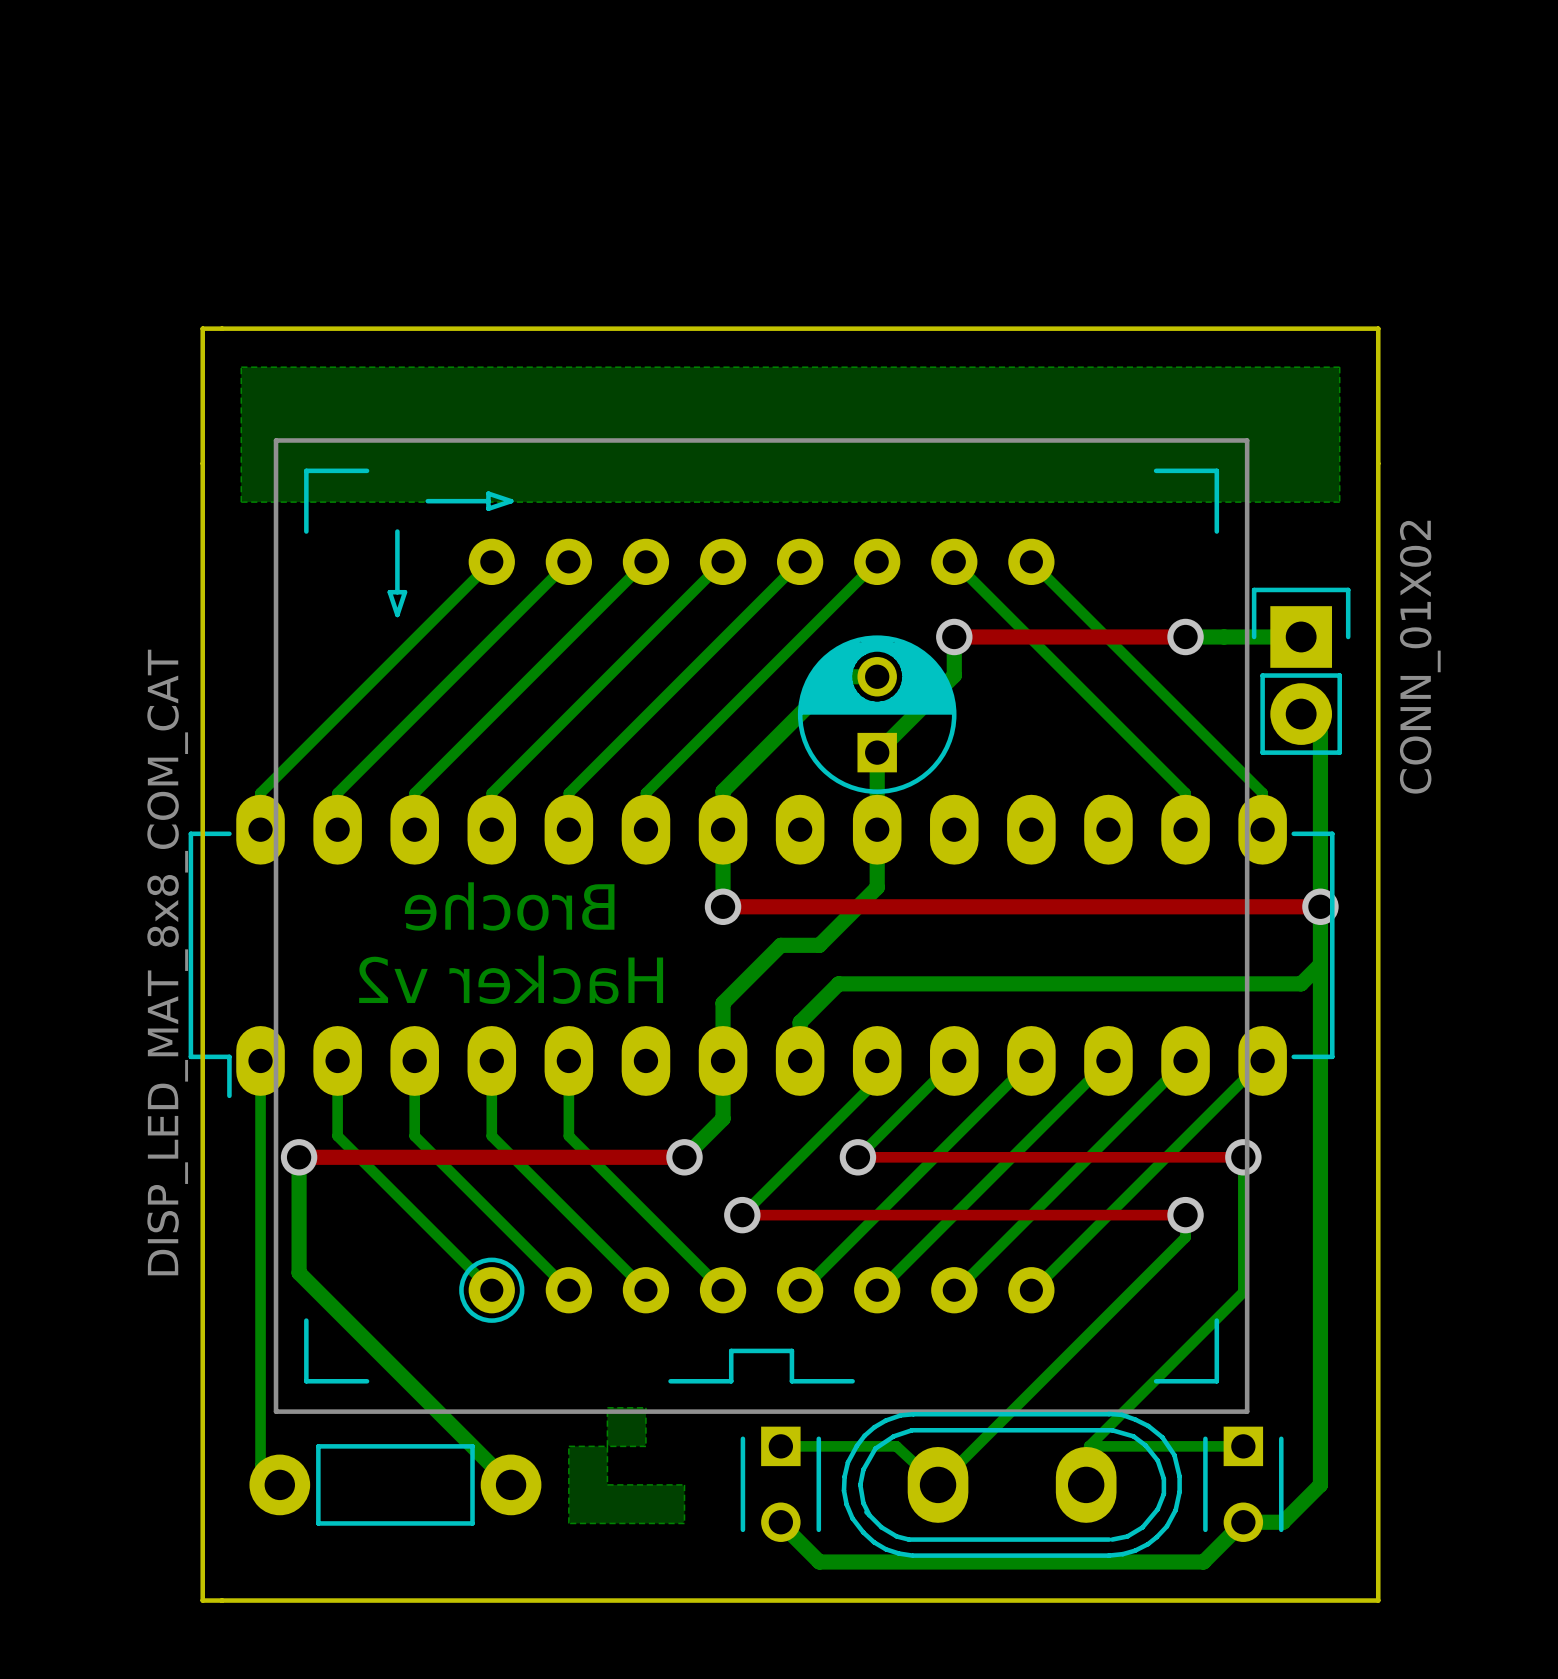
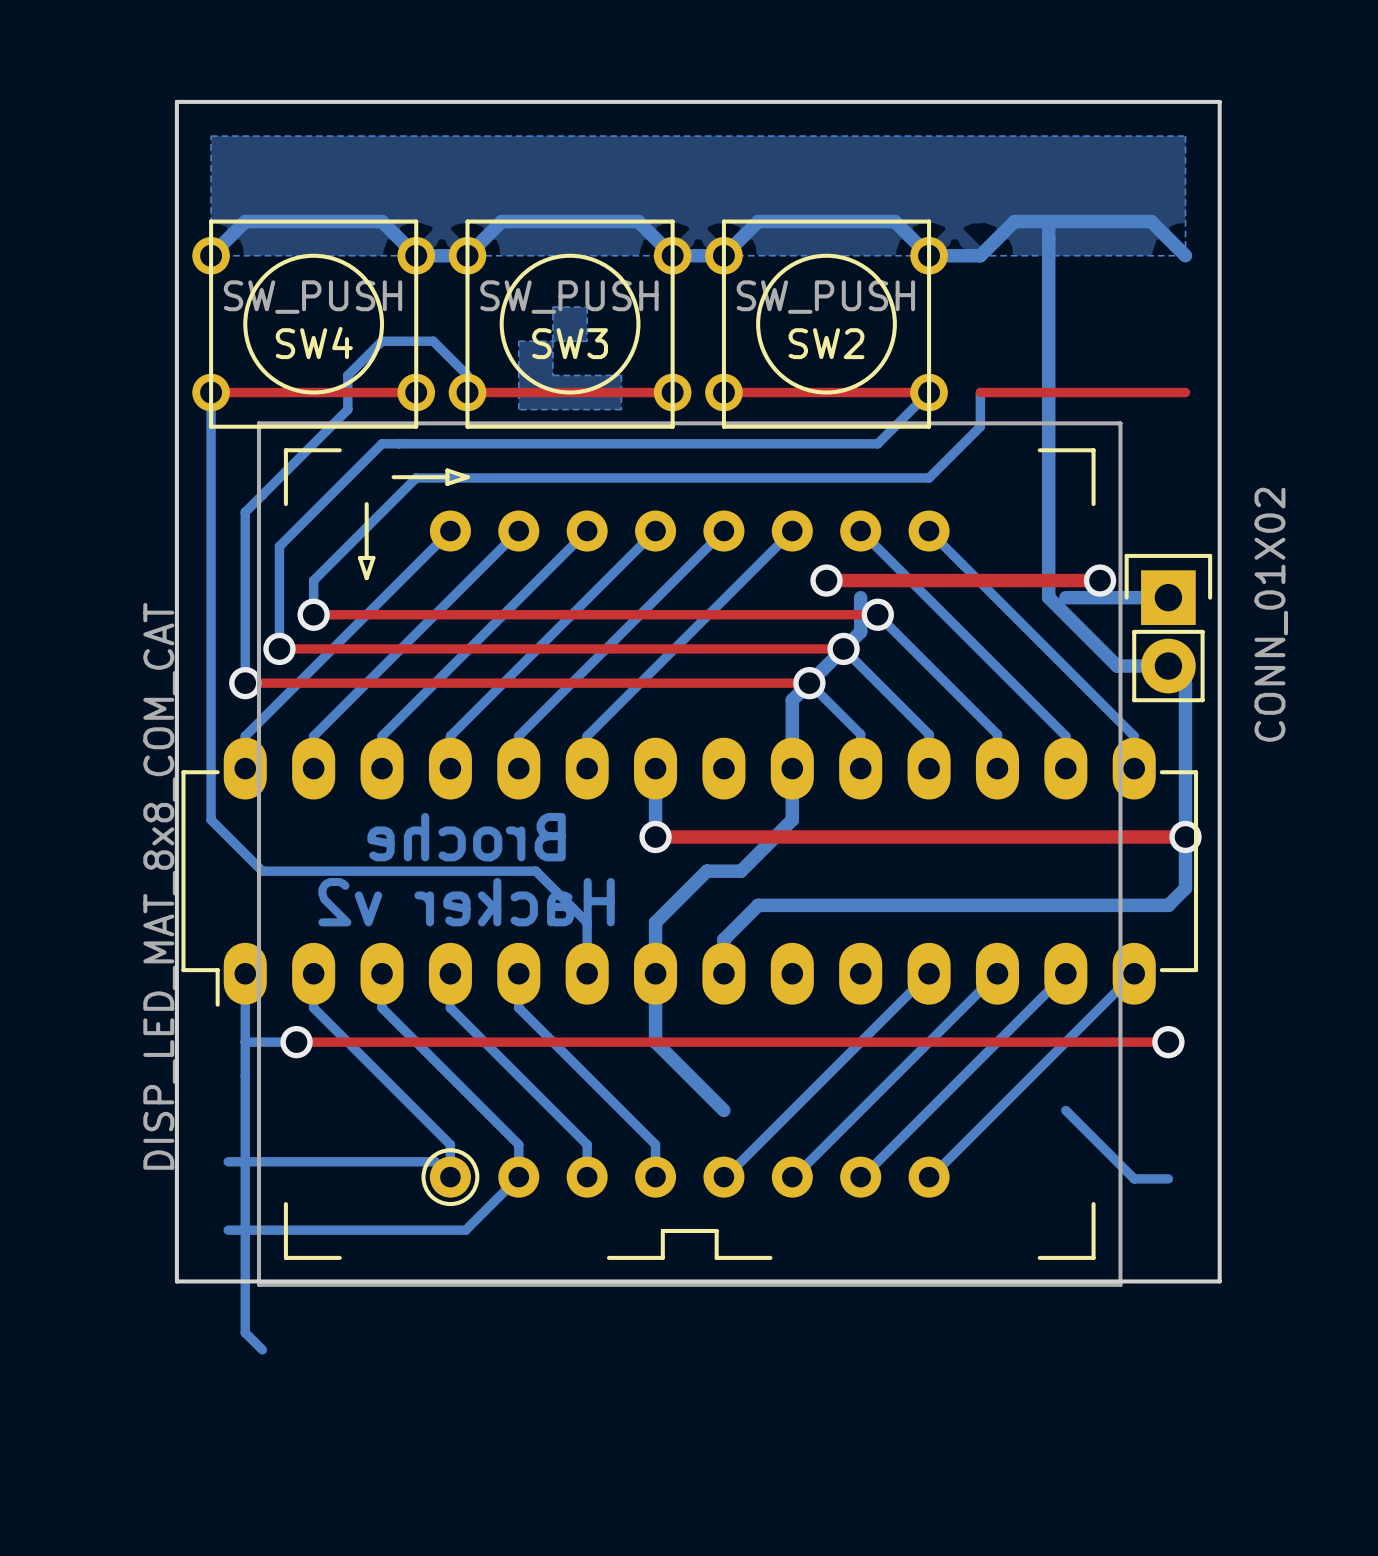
bottom track: none -> (1048, 221) (1048, 597) (1117, 666) (1168, 666)
bottom track: none -> (211, 255) (245, 221) (382, 221) (416, 255) (467, 255) (501, 221) (638, 221) (672, 255) (723, 255) (758, 221) (894, 221) (929, 255) (980, 255) (1014, 221) (1151, 221) (1185, 255)
bottom zone outline: none -> (552, 307) (552, 375) (621, 375) (621, 409) (518, 409) (518, 341) (587, 341) (587, 307) (552, 307)
board edge: (202, 328) (202, 1600) (1378, 1600) (1378, 328) (202, 328) -> (176, 101) (176, 1281) (1219, 1281) (1219, 101) (176, 101)
SW4: none -> SW_PUSH (313, 324)
SW3: none -> SW_PUSH (570, 324)
SW2: none -> SW_PUSH (826, 324)
bottom zone outline: (241, 367) (241, 502) (1339, 502) (1339, 367) (241, 367) -> (211, 136) (211, 255) (1185, 255) (1185, 136) (211, 136)
bottom track: none -> (211, 392) (211, 819) (262, 871) (535, 871) (587, 922) (587, 973)
top track: none -> (211, 392) (416, 392)
bottom track: none -> (467, 392) (467, 375) (433, 341) (382, 341) (347, 375) (347, 409) (245, 512) (245, 683)
top track: none -> (467, 392) (672, 392)
top track: none -> (723, 392) (929, 392)
bottom track: none -> (929, 392) (877, 443) (382, 443) (279, 546) (279, 648)
bottom track: none -> (980, 392) (980, 426) (929, 477) (416, 477) (313, 580) (313, 614)
top track: none -> (826, 580) (1100, 580)
via: none -> (826, 580)
top track: (954, 636) (1185, 636) -> (980, 392) (1185, 392)
via position: (954, 636) -> (877, 614)
via position: (1185, 636) -> (1100, 580)
top track: none -> (313, 614) (877, 614)
via: none -> (313, 614)
bottom track: none -> (877, 614) (997, 734) (997, 768)
bottom track: (877, 676) (837, 676) (723, 791) (723, 829) -> none
top track: none -> (279, 648) (843, 648)
via: none -> (279, 648)
bottom track: none -> (843, 648) (929, 734) (929, 768)
via: none -> (843, 648)
part: (877, 714) -> none
top track: none -> (245, 683) (809, 683)
via: none -> (245, 683)
bottom track: none -> (809, 683) (860, 734) (860, 768)
via: none -> (809, 683)
bottom track: (1320, 964) (1320, 1484) (1283, 1522) (1243, 1522) (1203, 1562) (819, 1562) (780, 1522) -> none
bottom track: (954, 1060) (857, 1157) -> none
bottom track: (877, 1080) (742, 1215) -> none
bottom track: (337, 1099) (337, 1136) (474, 1272) -> (313, 1007) (450, 1144) (450, 1177)
bottom track: (414, 1099) (414, 1136) (568, 1290) -> (382, 1007) (518, 1144) (518, 1177) (465, 1230) (228, 1230)
bottom track: (491, 1099) (491, 1136) (645, 1290) -> (450, 1007) (587, 1144) (587, 1177)
bottom track: (568, 1099) (568, 1136) (723, 1290) -> (518, 1007) (655, 1144) (655, 1177)
bottom track: (723, 1118) (684, 1157) -> (655, 1025) (655, 1042) (723, 1110)
bottom track: none -> (245, 1042) (296, 1042)
top track: none -> (296, 1042) (1168, 1042)
bottom track: (299, 1157) (299, 1272) (511, 1484) -> none
top track: (299, 1157) (684, 1157) -> none
via position: (299, 1157) -> (296, 1042)
via: (684, 1157) -> none
top track: (857, 1157) (1243, 1157) -> none
via: (857, 1157) -> none
bottom track: (1243, 1157) (1243, 1292) (1089, 1446) -> none
via position: (1243, 1157) -> (1168, 1042)
top track: (742, 1215) (1185, 1215) -> none
via: (742, 1215) -> none
bottom track: (1185, 1215) (1185, 1237) (938, 1484) (896, 1446) (780, 1446) -> (1065, 1110) (1134, 1178) (1168, 1178)
via: (1185, 1215) -> none
bottom track: none -> (228, 1161) (435, 1161)
bottom zone outline: (607, 1407) (607, 1484) (684, 1484) (684, 1523) (568, 1523) (568, 1446) (645, 1446) (645, 1407) (607, 1407) -> none
bottom track: (1089, 1446) (1243, 1446) -> none
part: (395, 1484) -> none
part: (780, 1484) -> none
part: (1011, 1484) -> none
part: (1243, 1484) -> none

